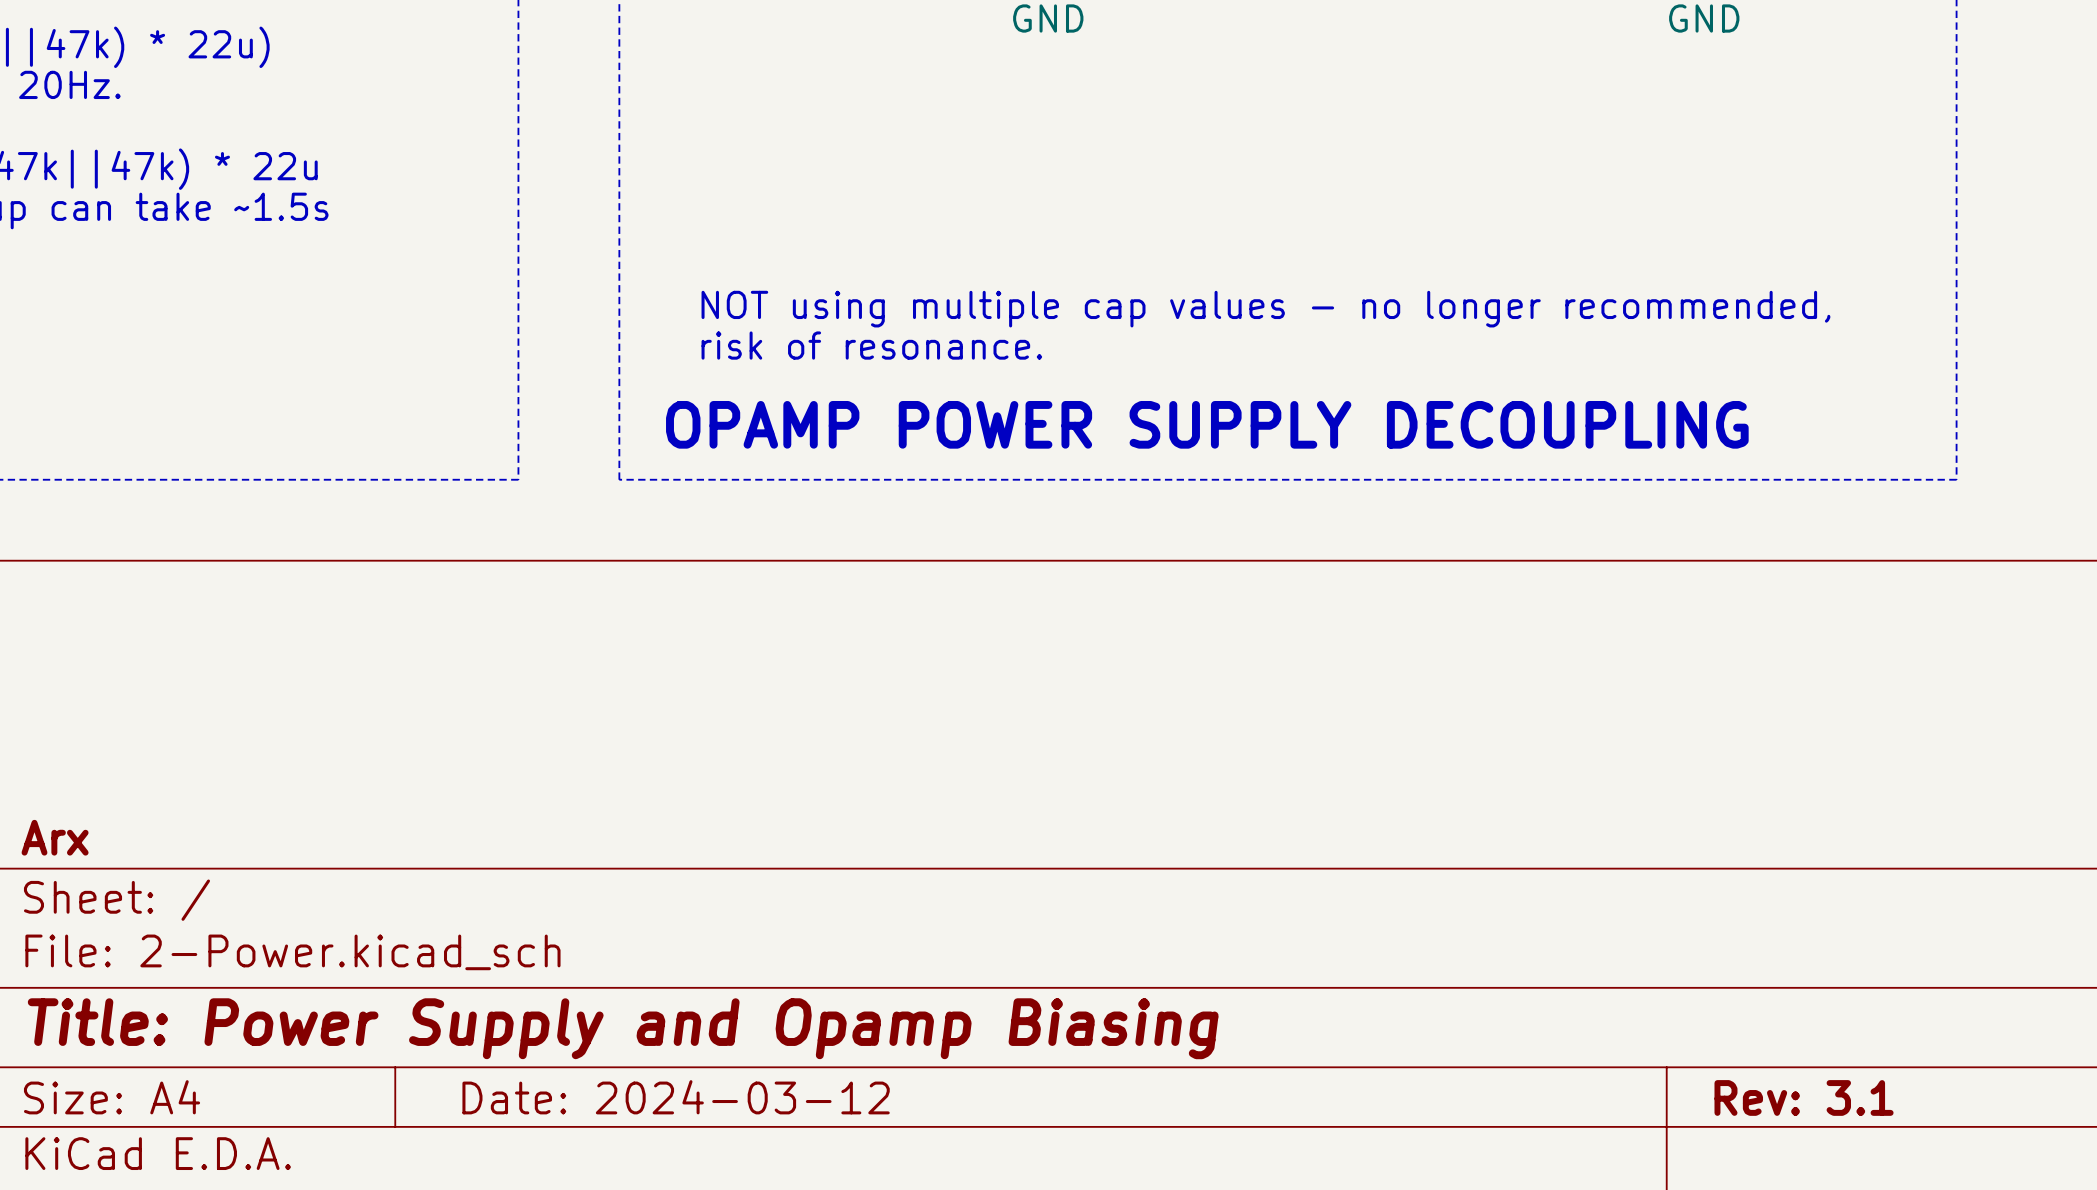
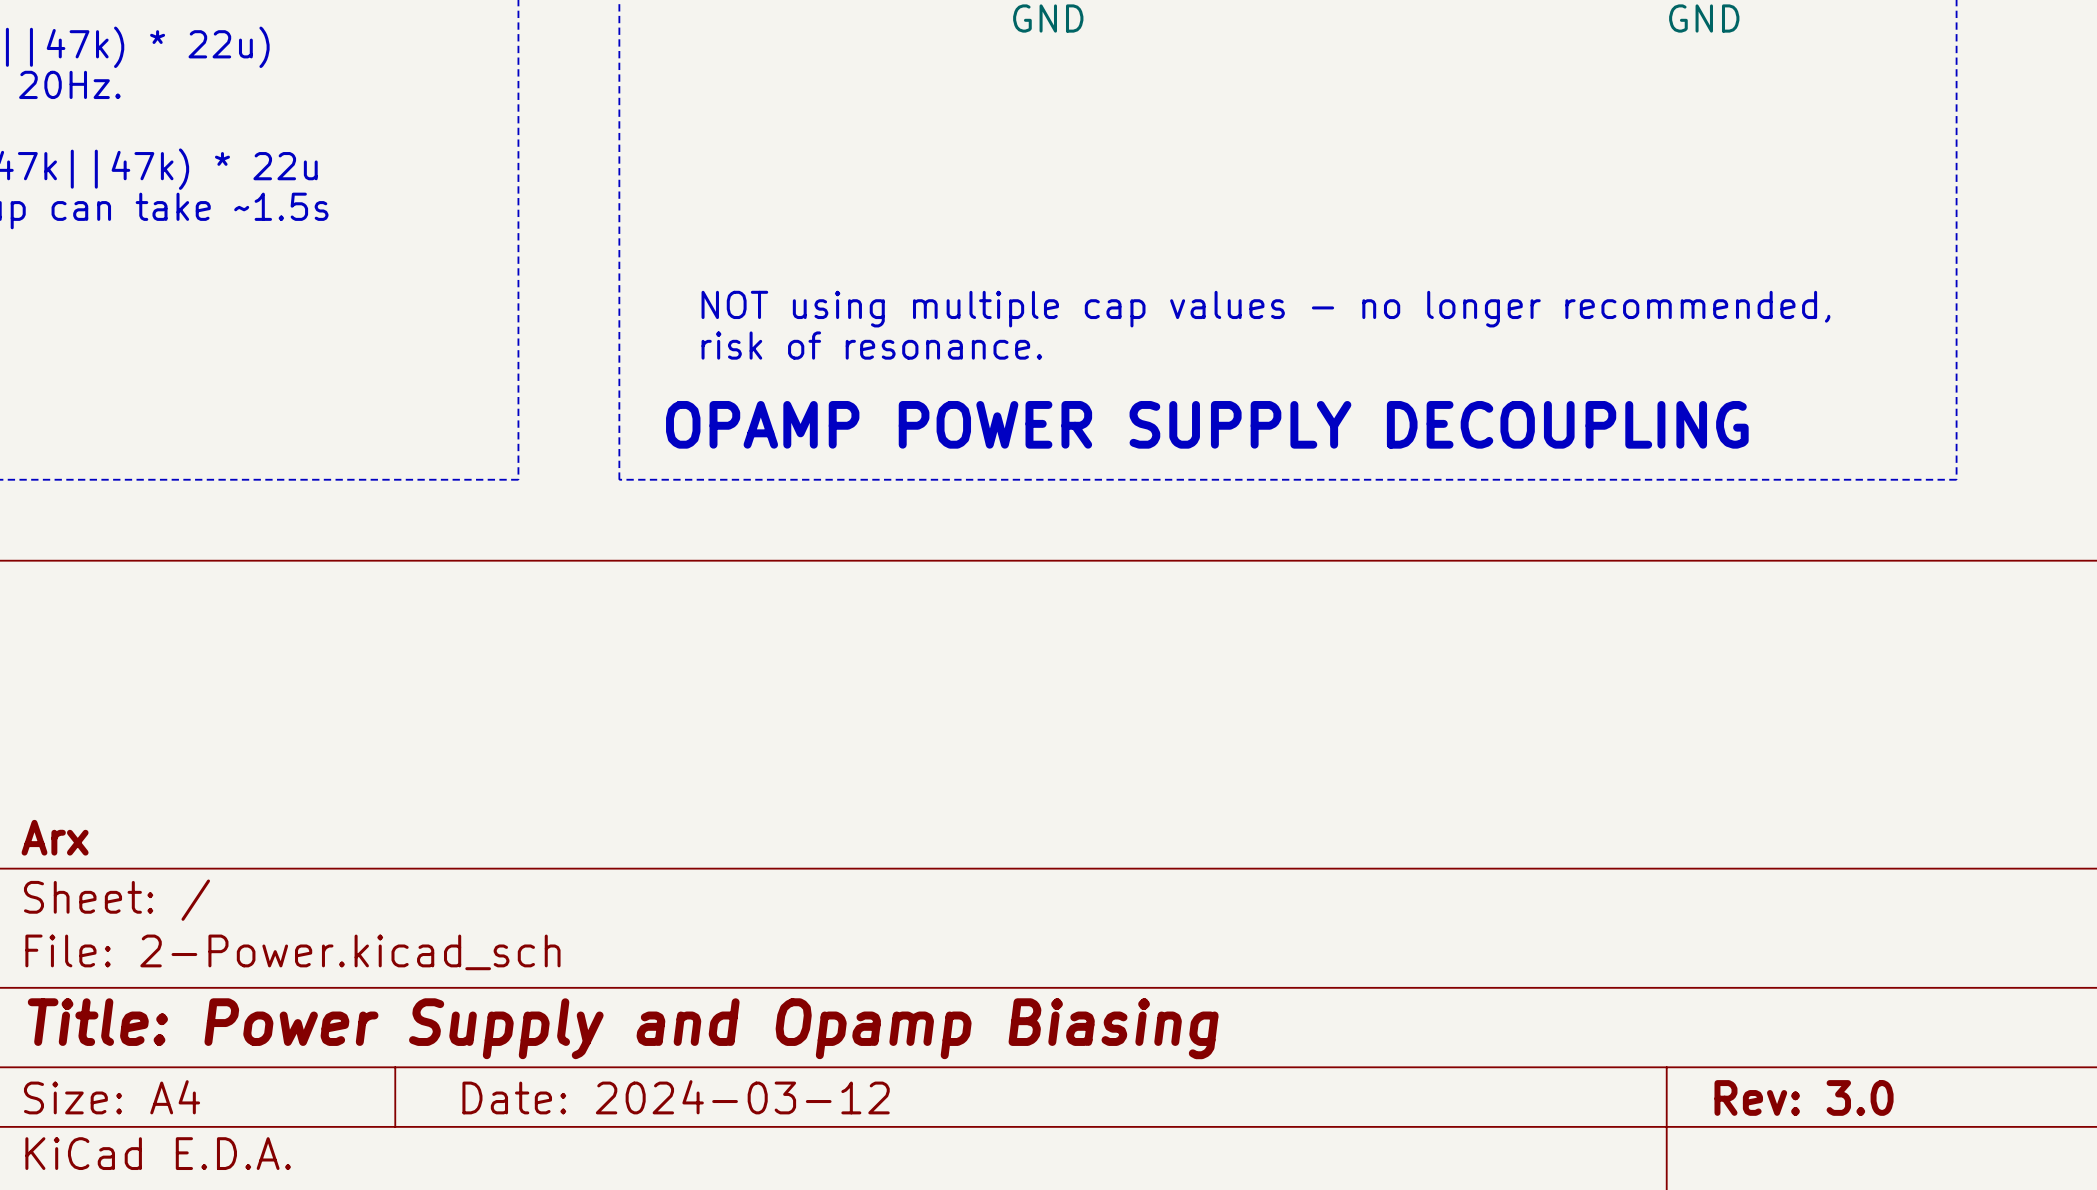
title block: Rev: 3.1 (1804, 1097) -> Rev: 3.0 (1804, 1097)

